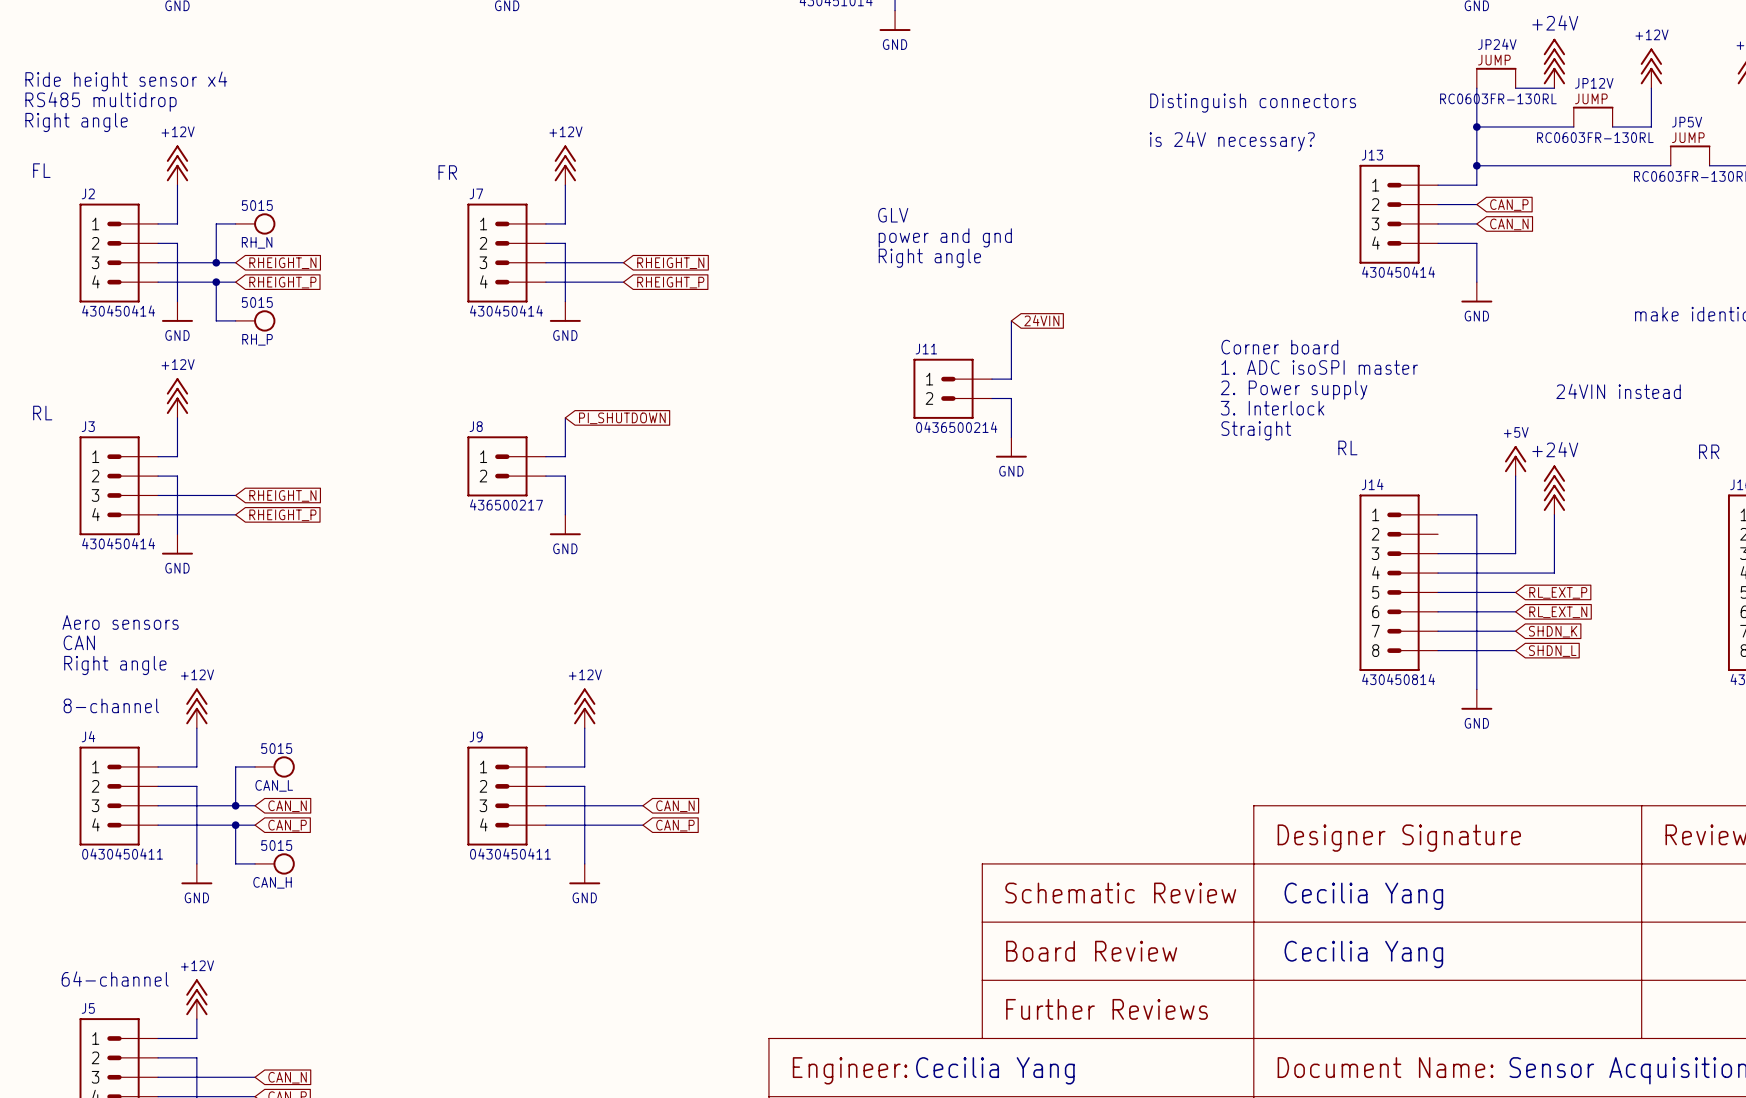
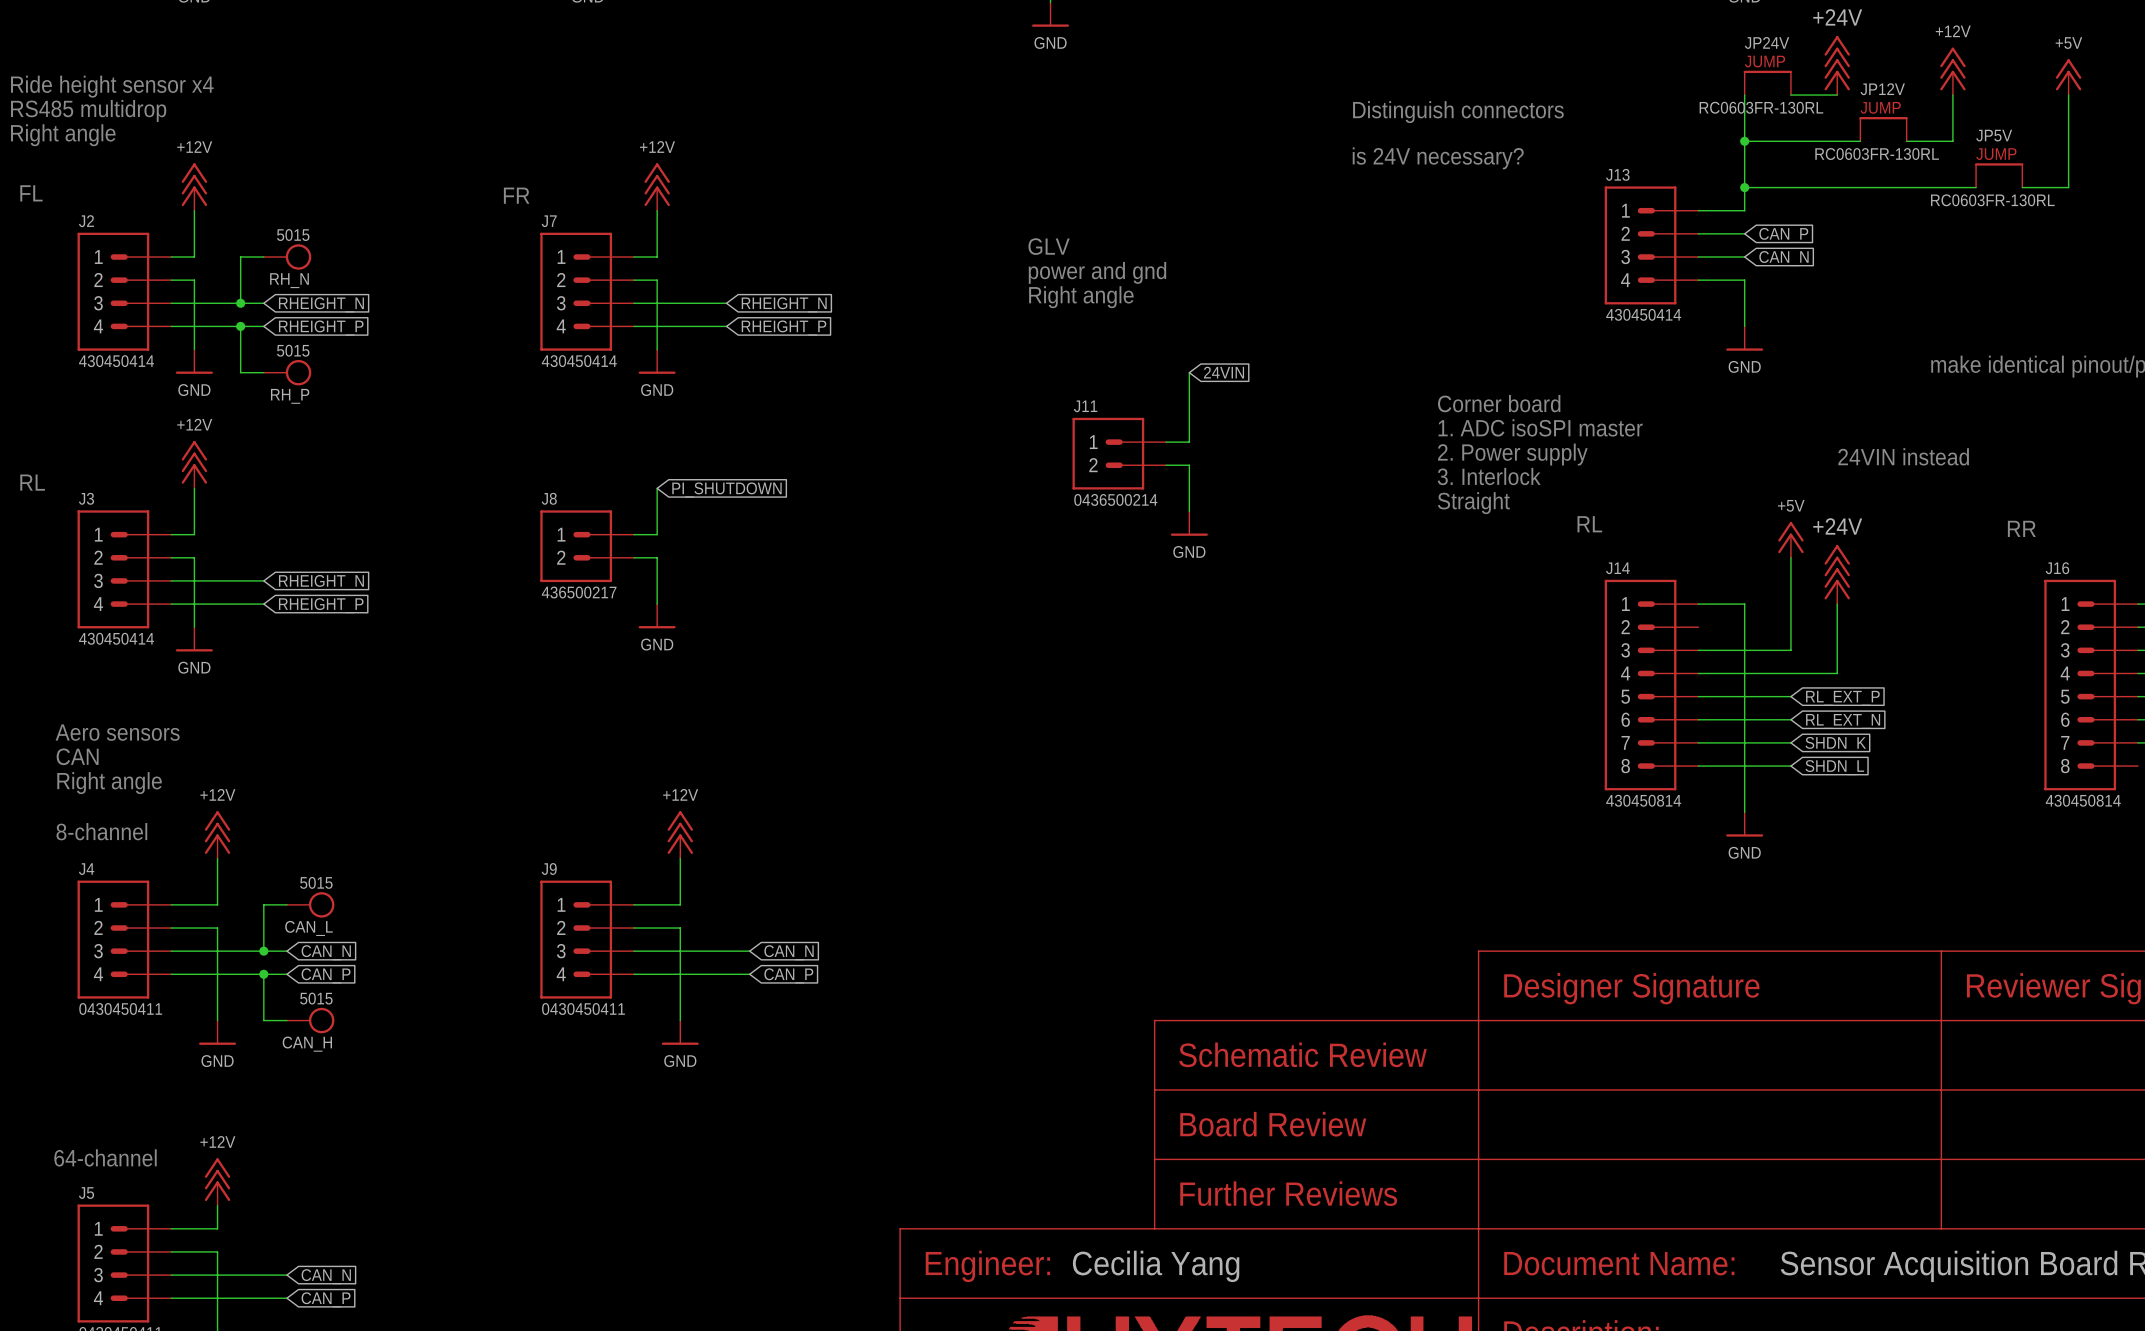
text: Cecilia Yang (1363, 896) -> none
text: Cecilia Yang (1363, 954) -> none

